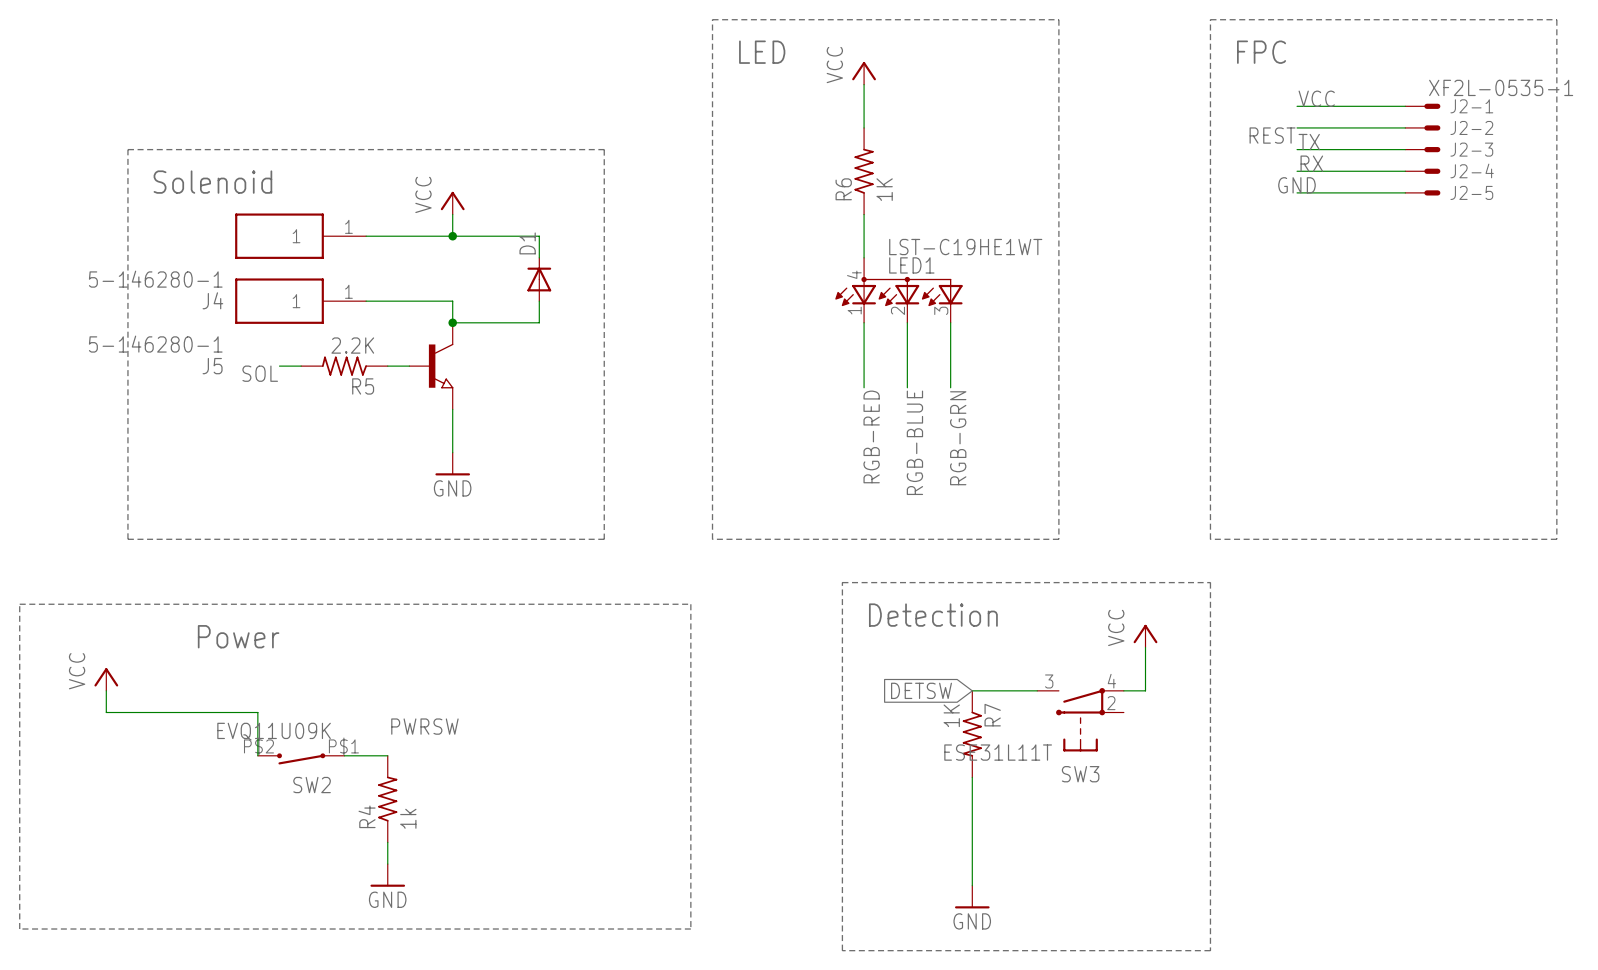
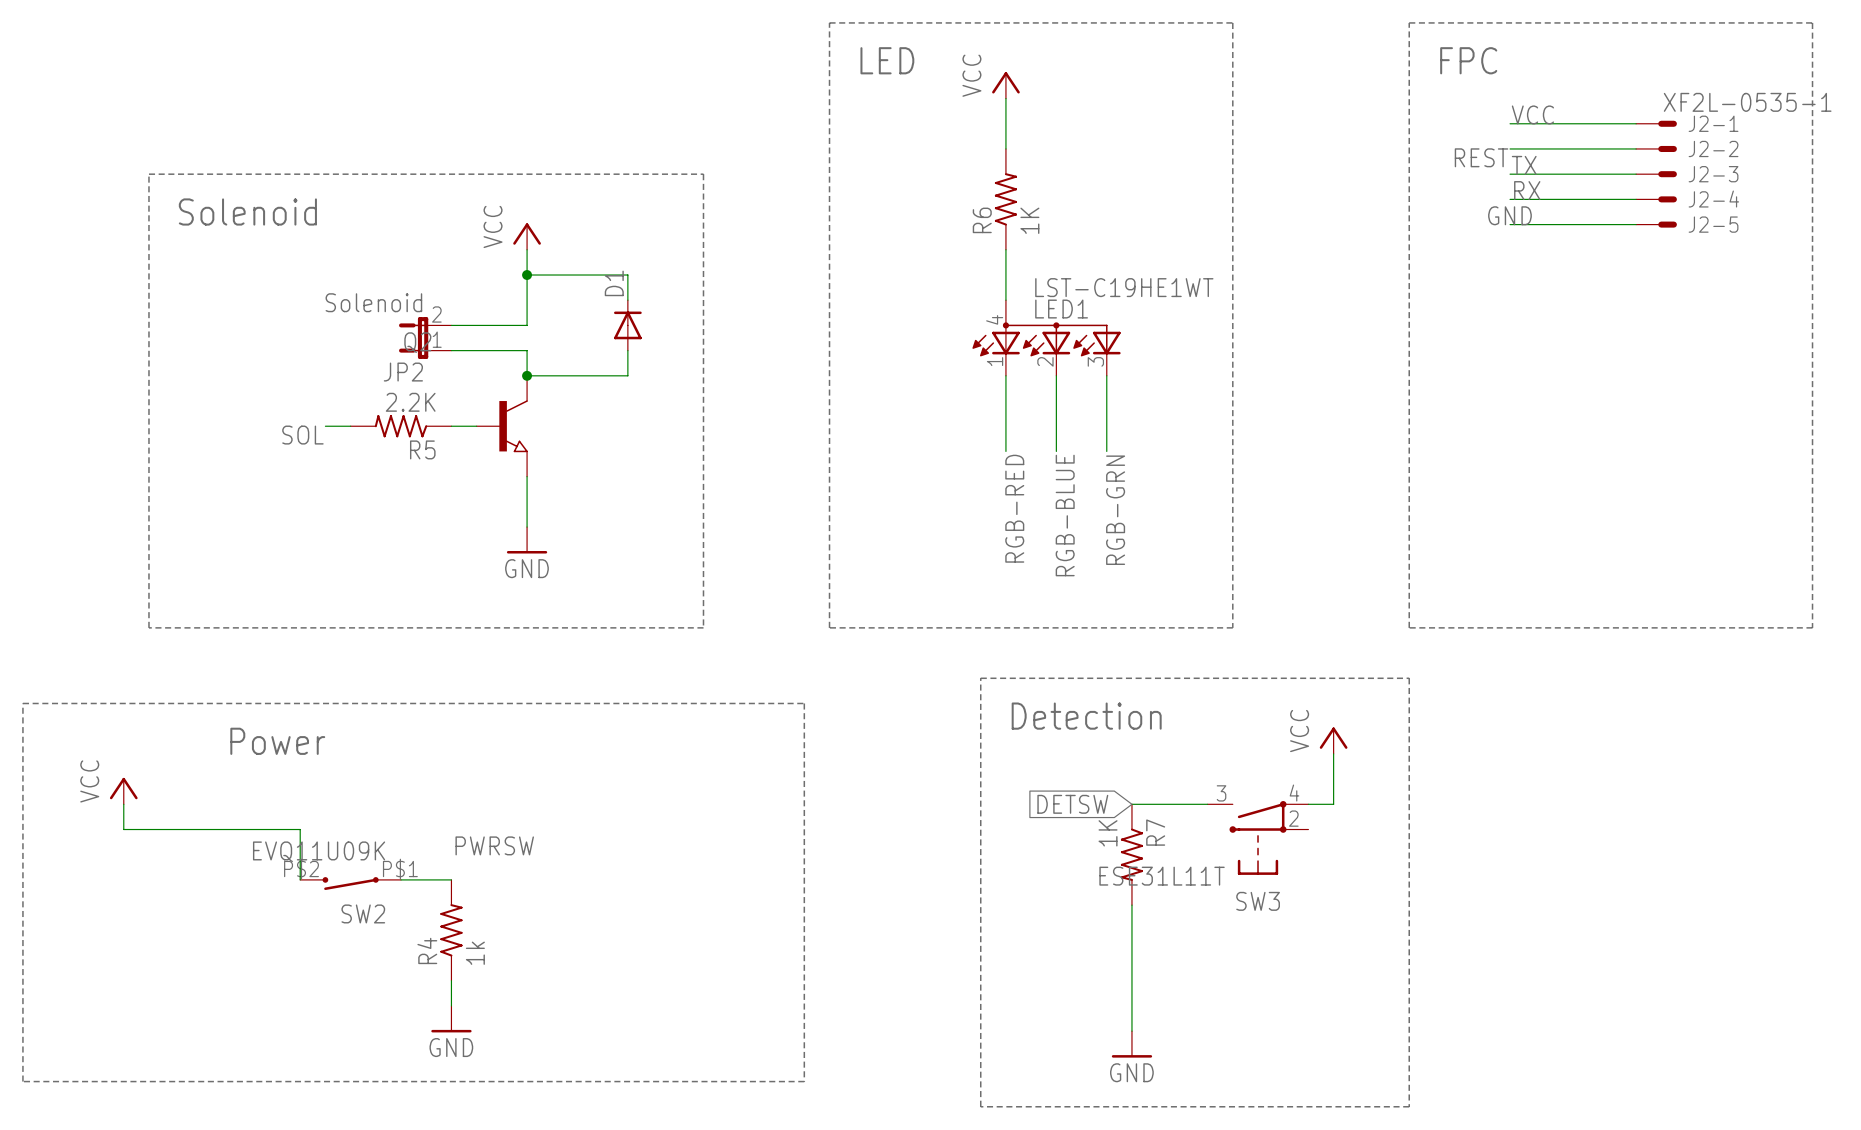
J4: 5-146280-1 (300, 236) -> none
wire: (366, 236) (452, 236) -> (451, 325) (527, 325) (527, 275)
JP2: none -> Solenoid (425, 338)
Q2 name: none -> Q2 (417, 342)
J5: 5-146280-1 (300, 301) -> none

